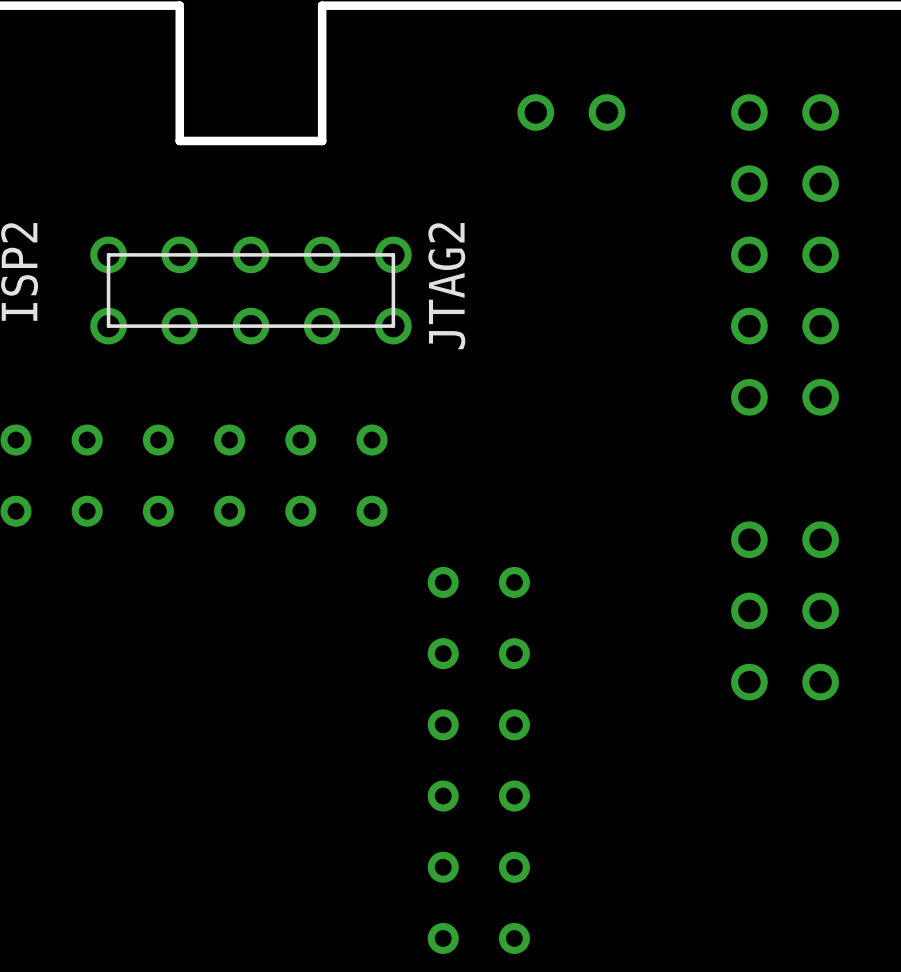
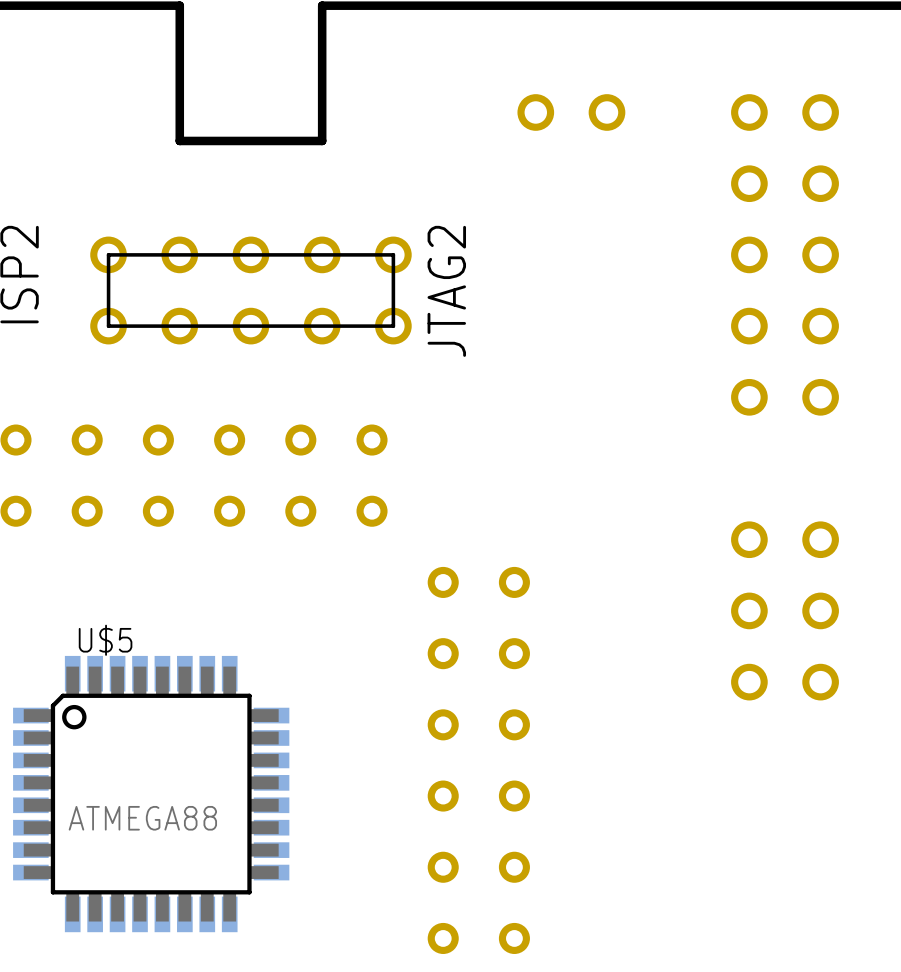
U$5: none -> ATMEGA88 (151, 794)

